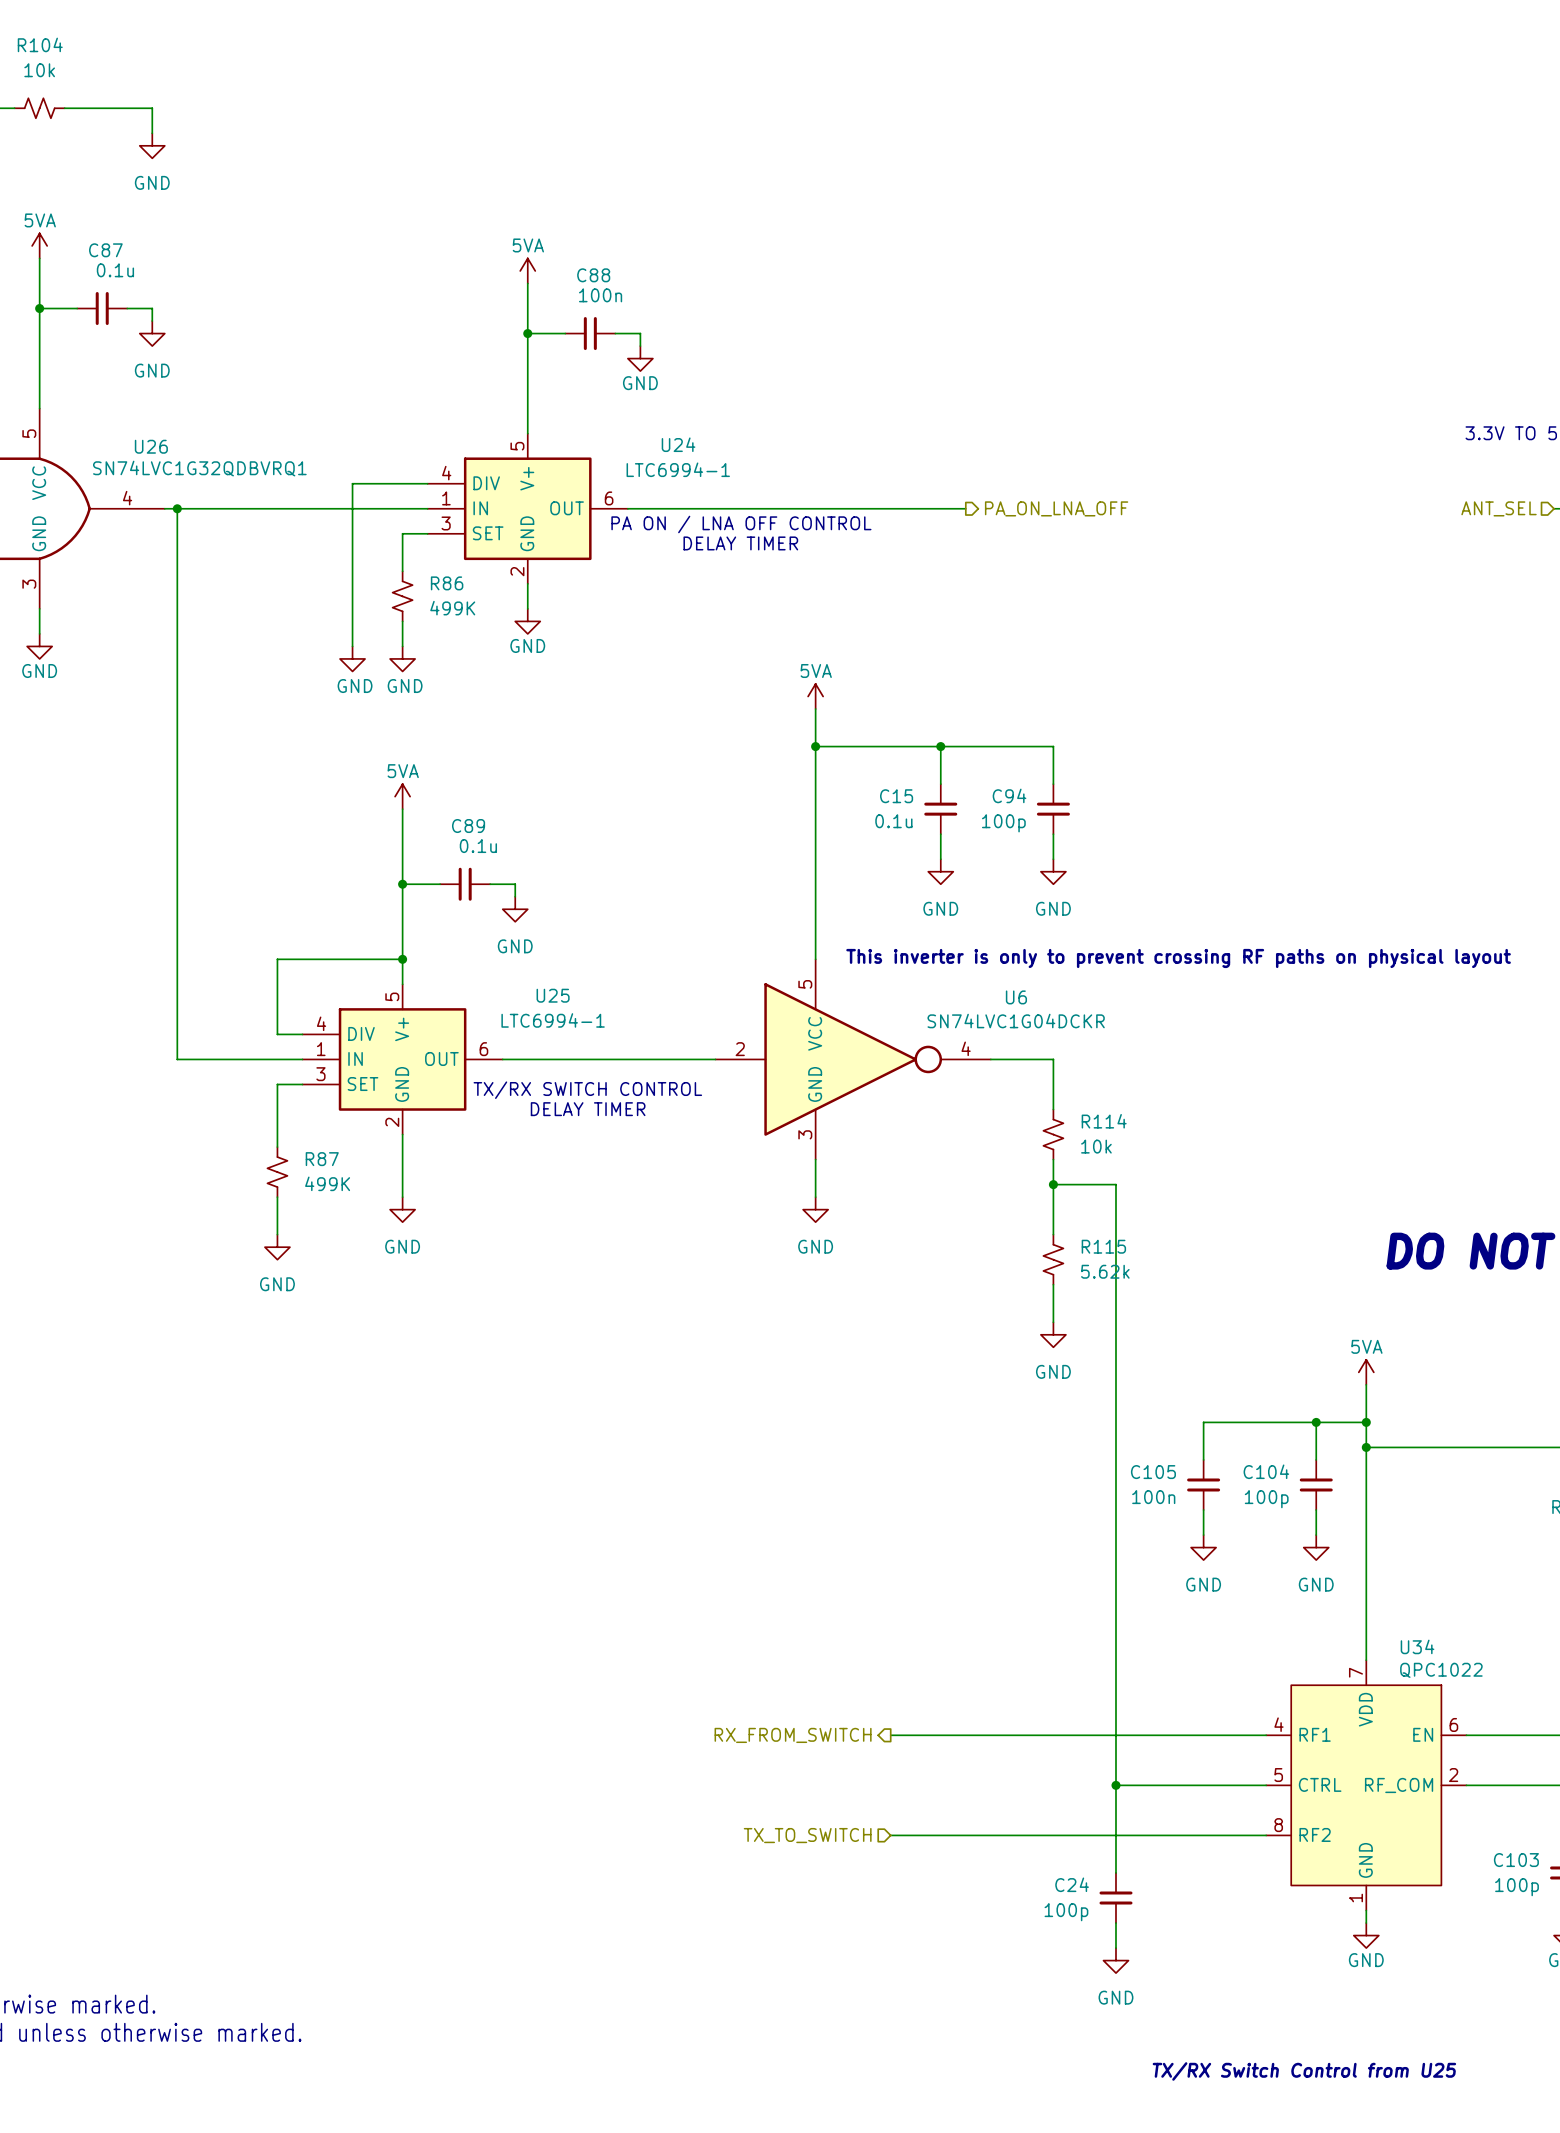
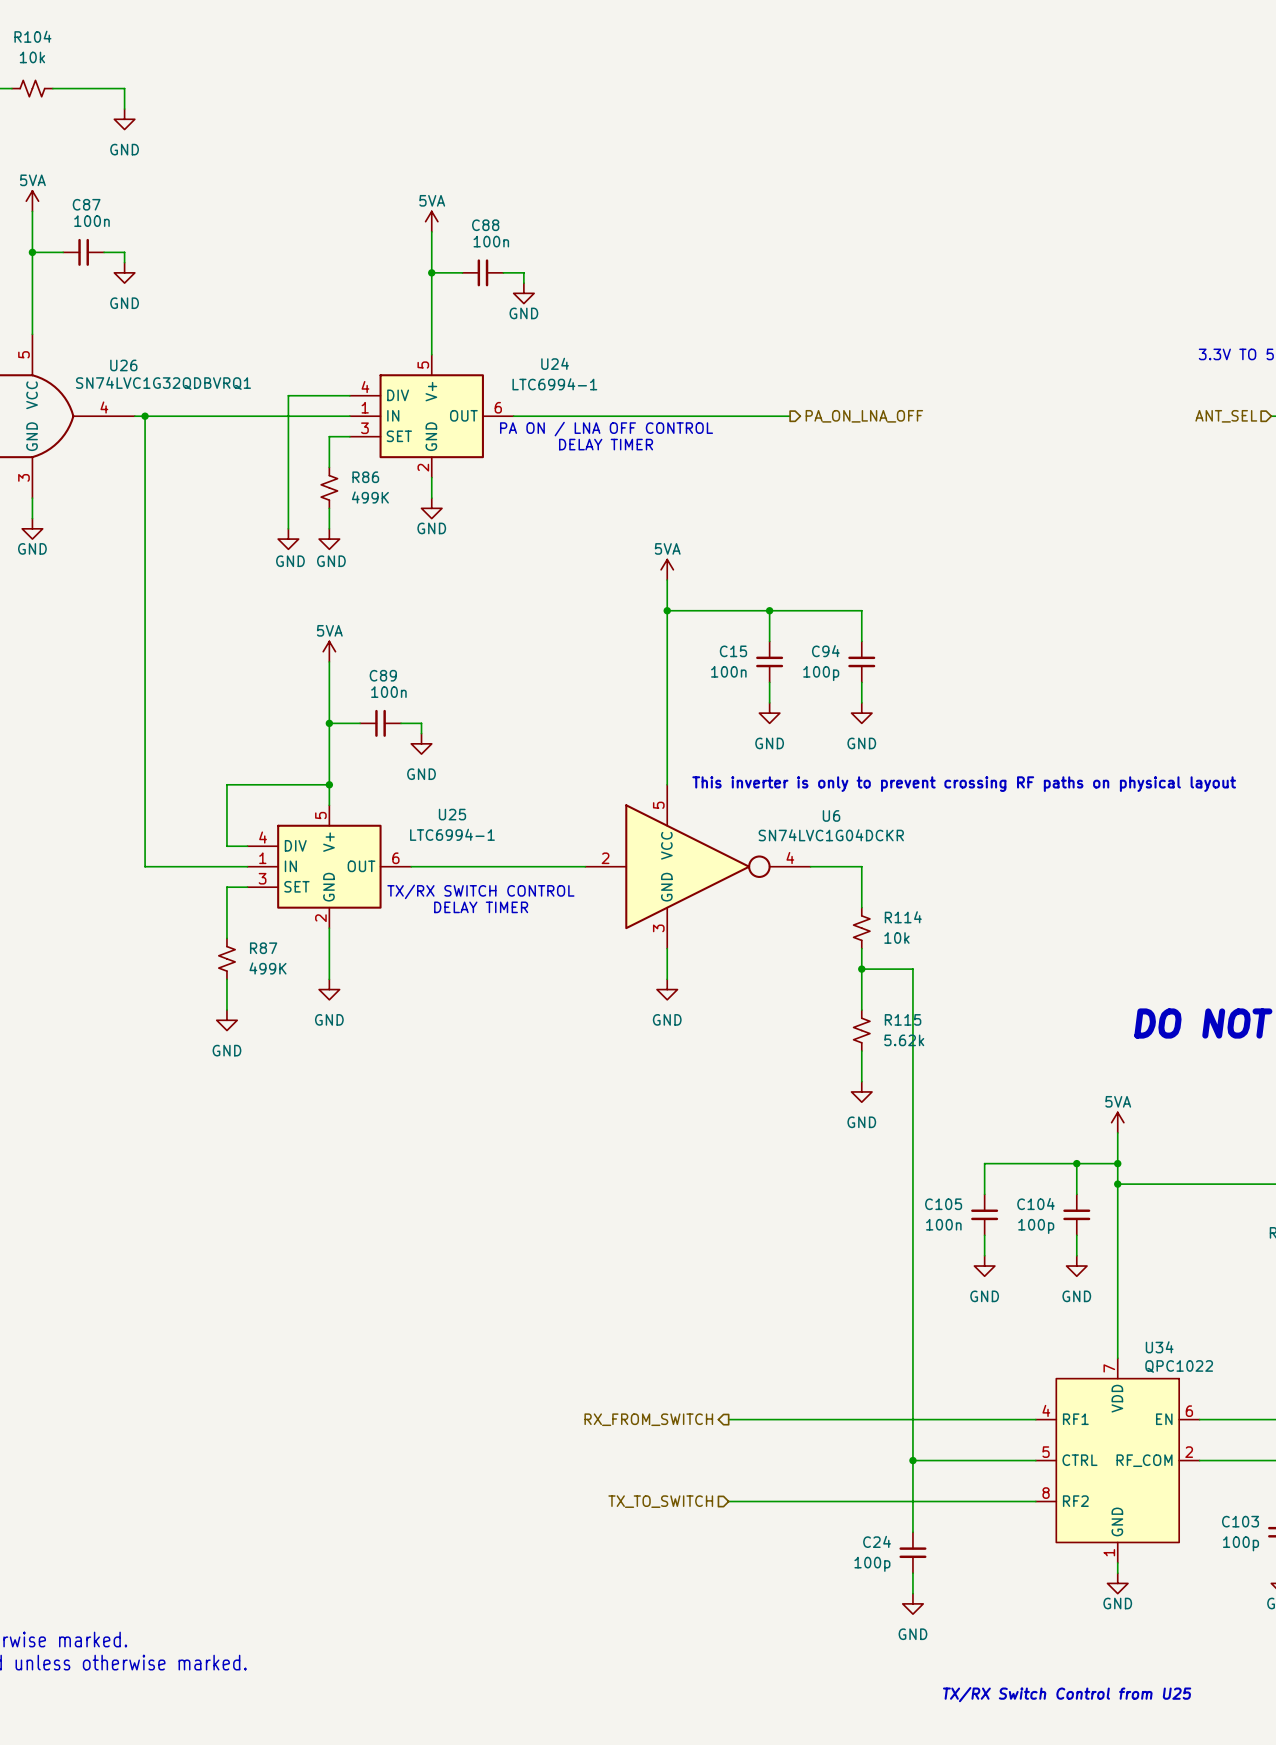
C87 value: 0.1u (115, 270) -> 100n (91, 221)
C15 value: 0.1u (893, 821) -> 100n (728, 671)
C89 value: 0.1u (478, 846) -> 100n (388, 692)

